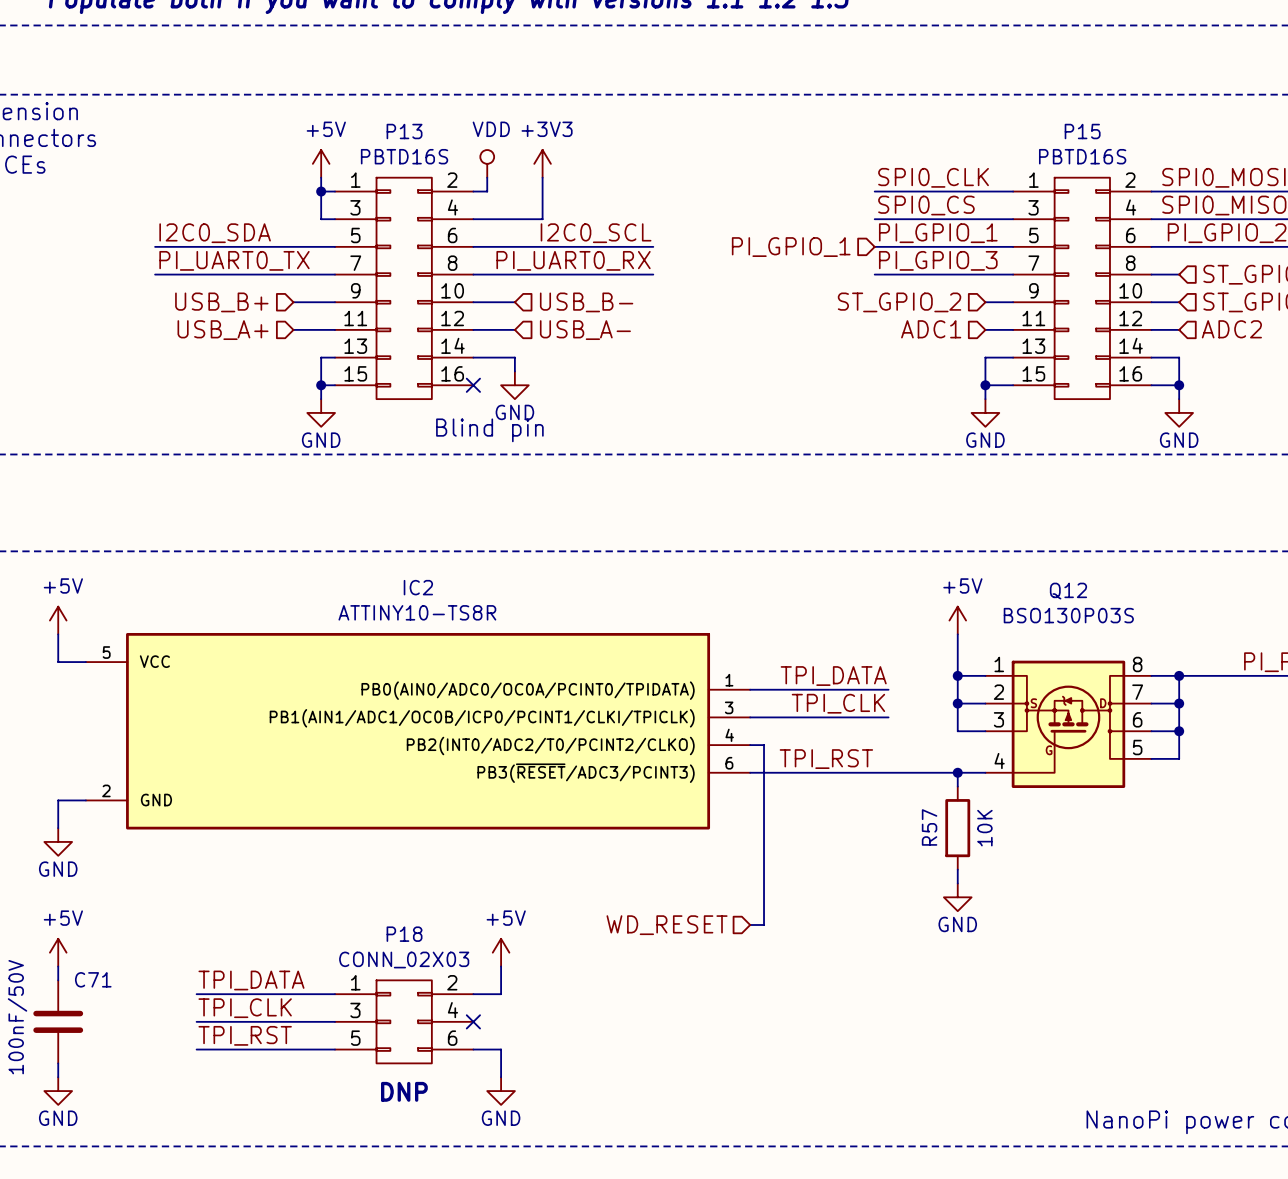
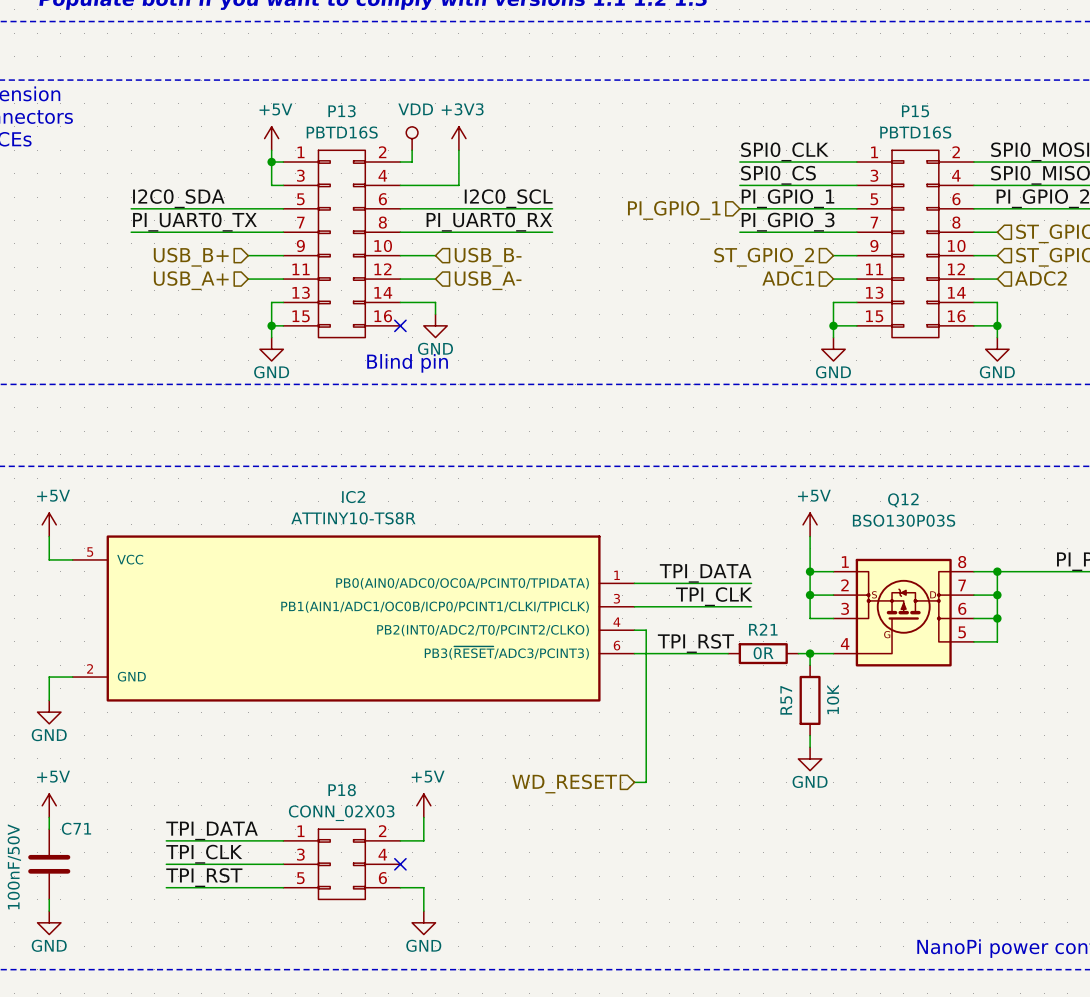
wire: (860, 772) (943, 772) -> none
R21: none -> 0R (763, 653)
text: DNP (404, 1091) -> none

